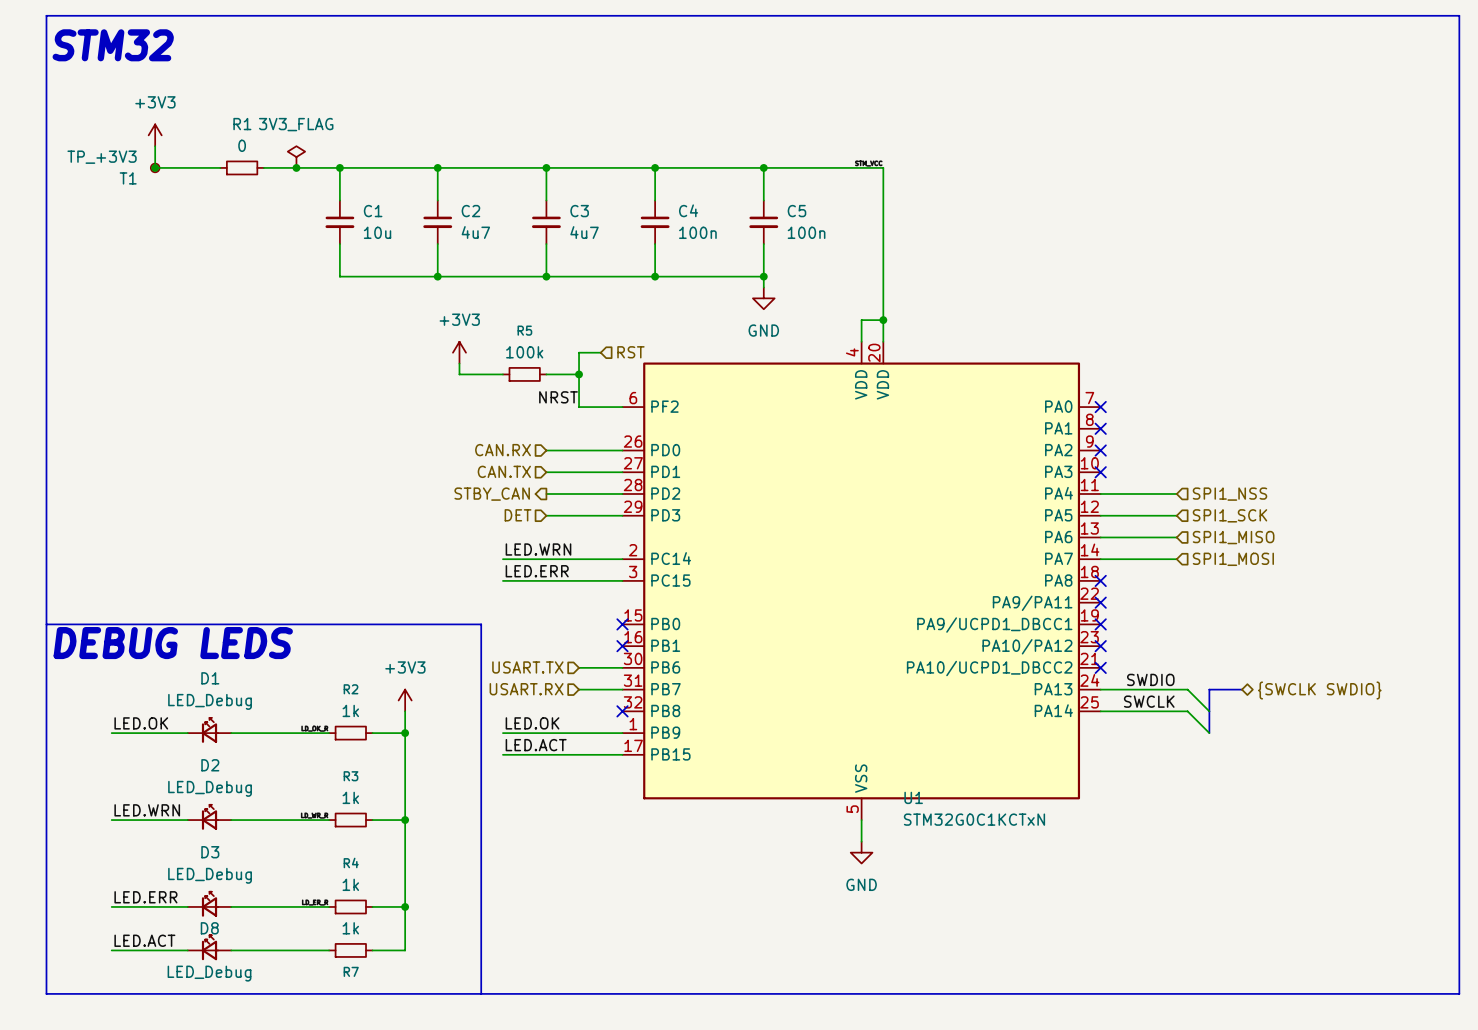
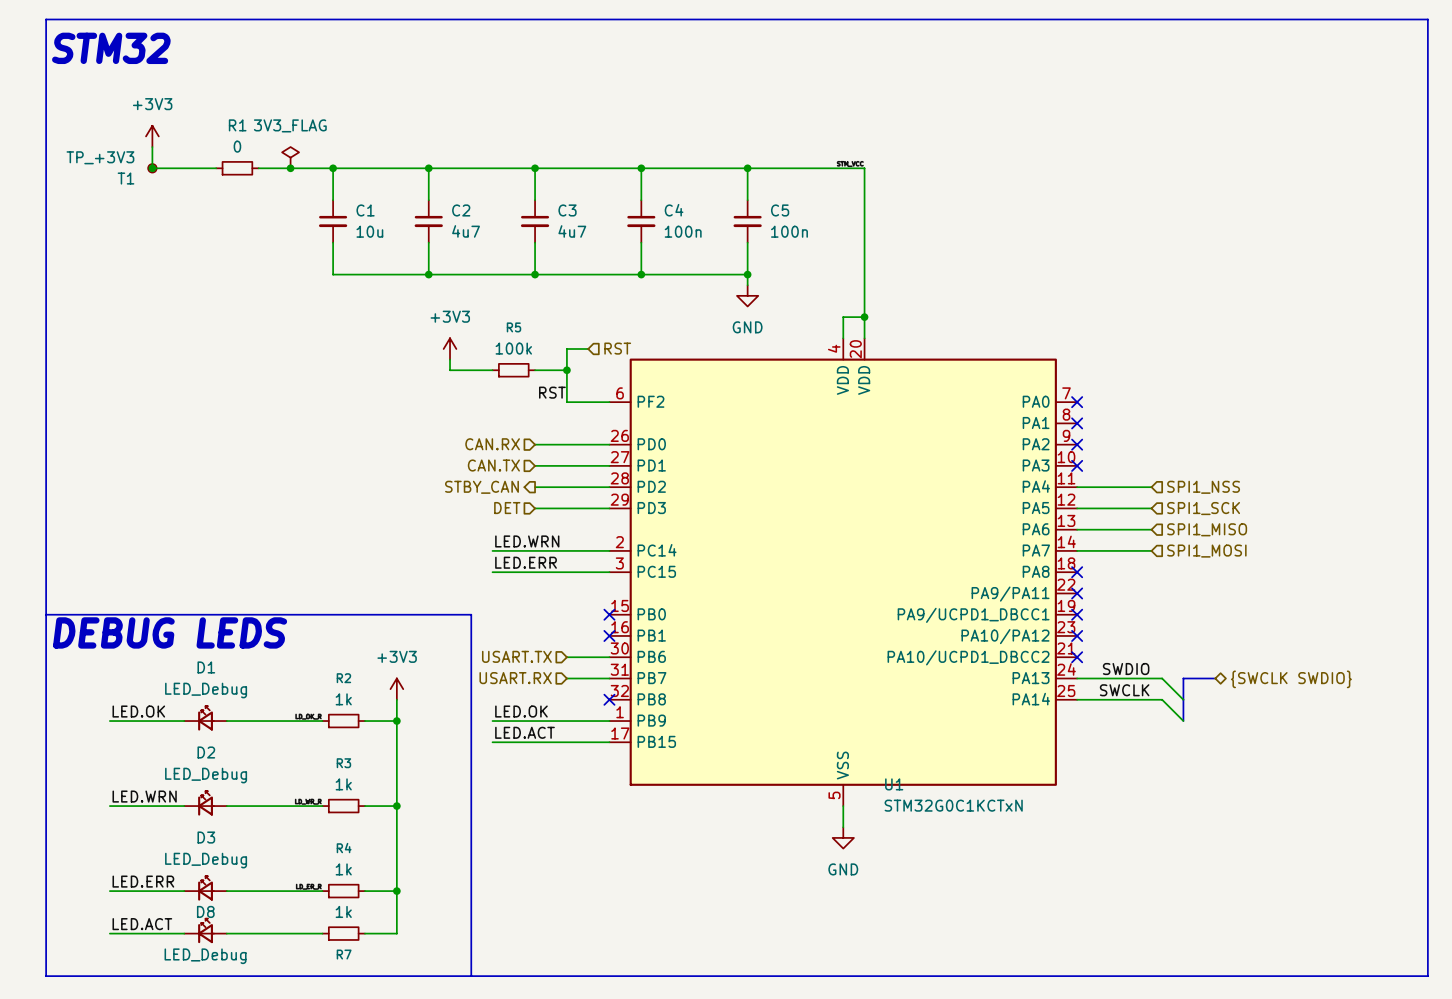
label: NRST (558, 397) -> RST (552, 392)

